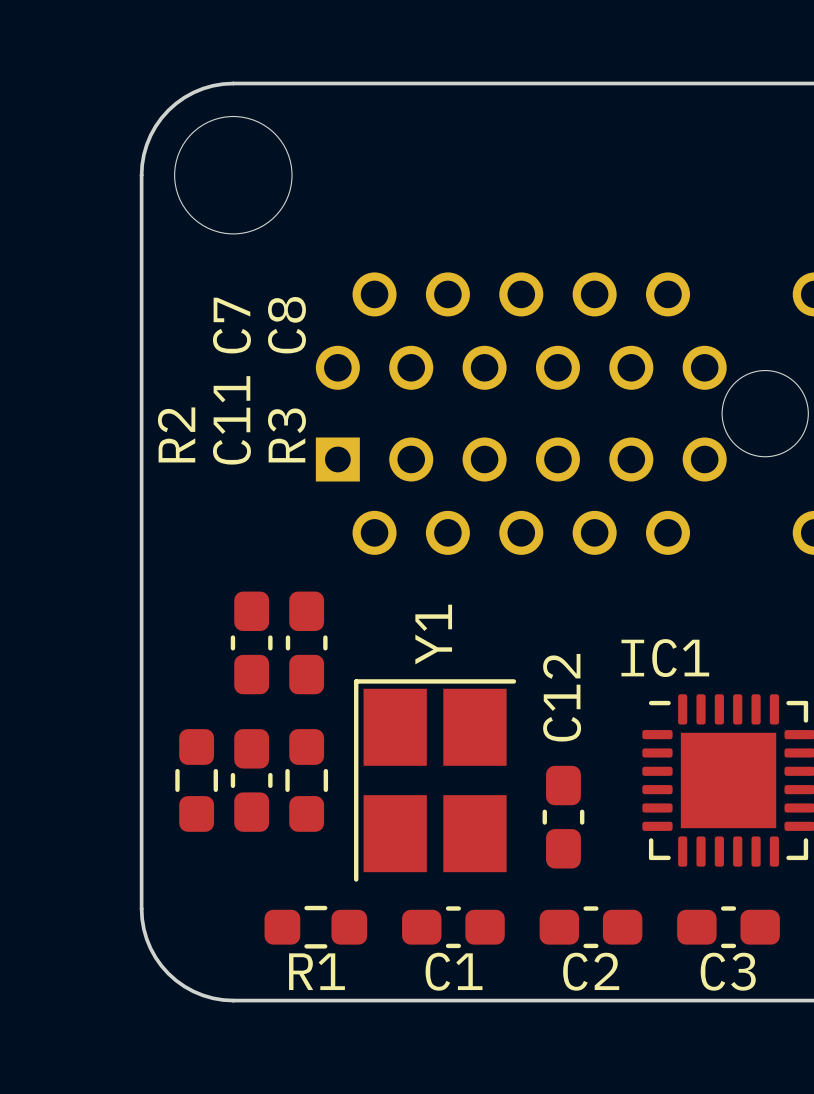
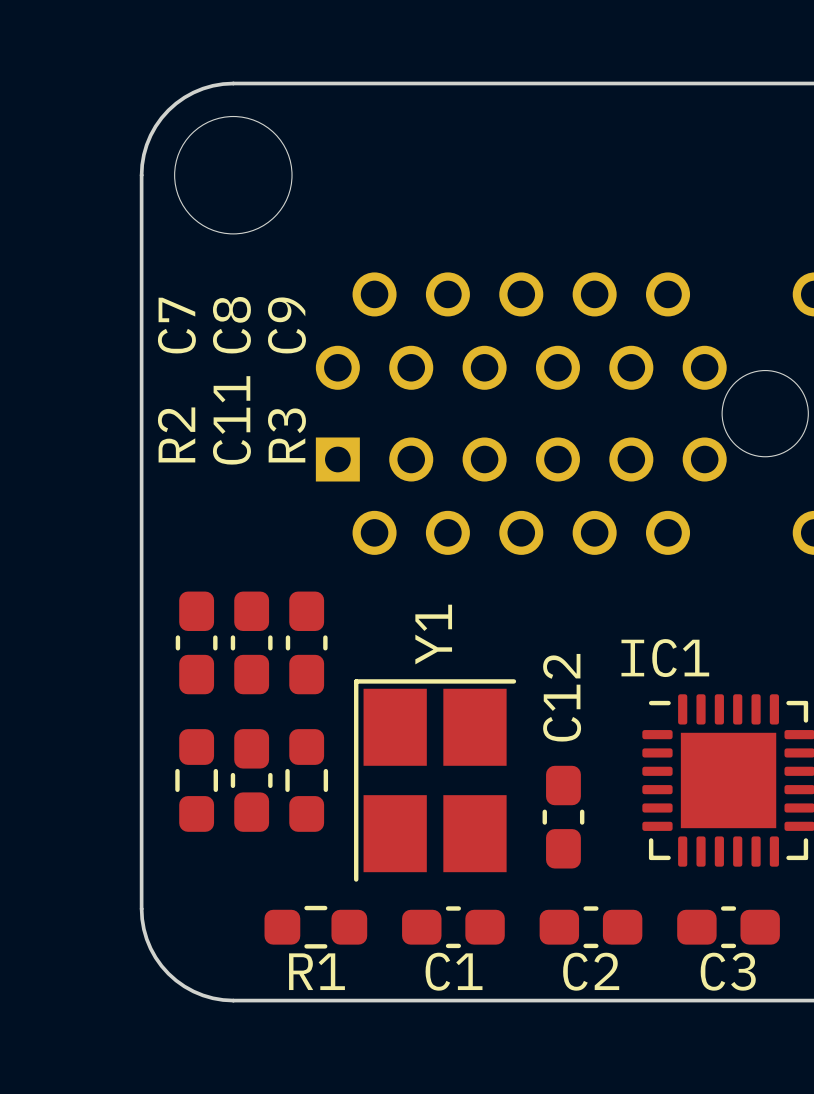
C7 name: C7 (231, 325) -> C8 (231, 325)
C8 name: C8 (286, 325) -> C9 (286, 325)
C7: none -> (196, 642)

